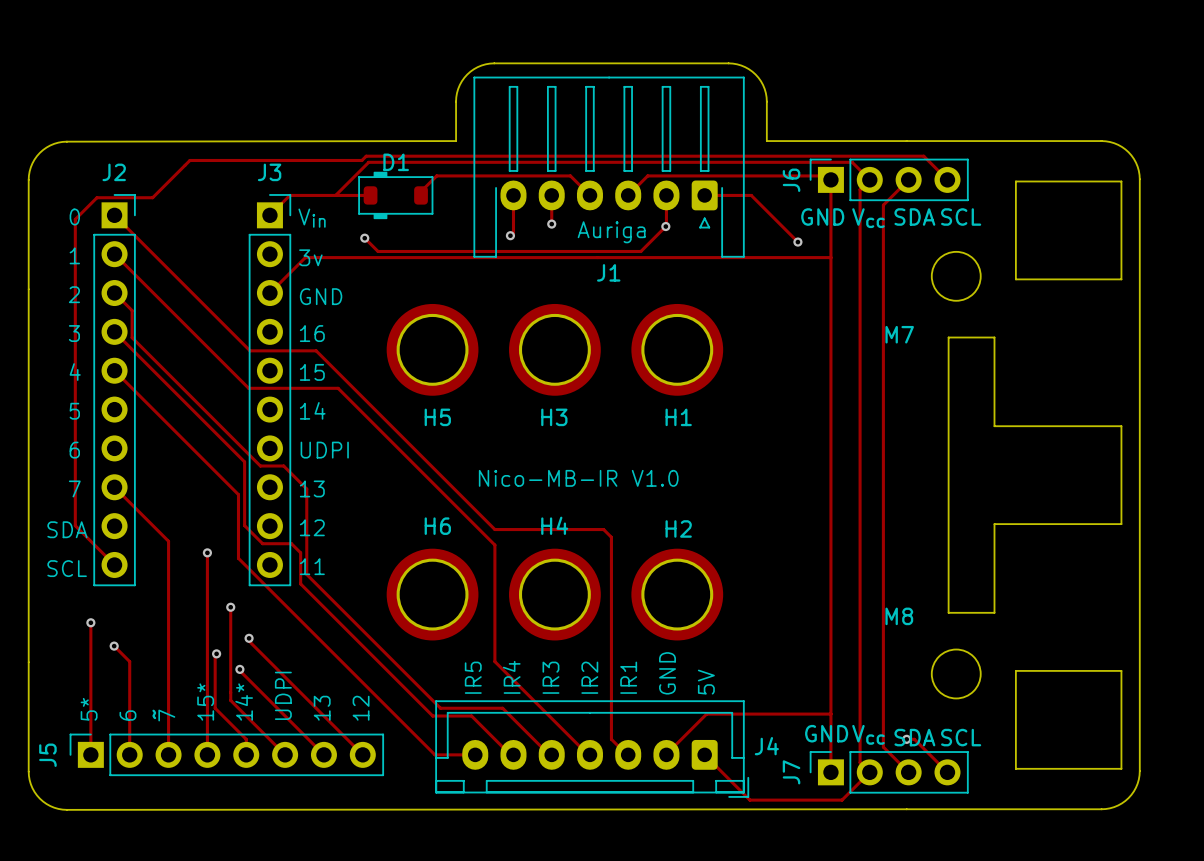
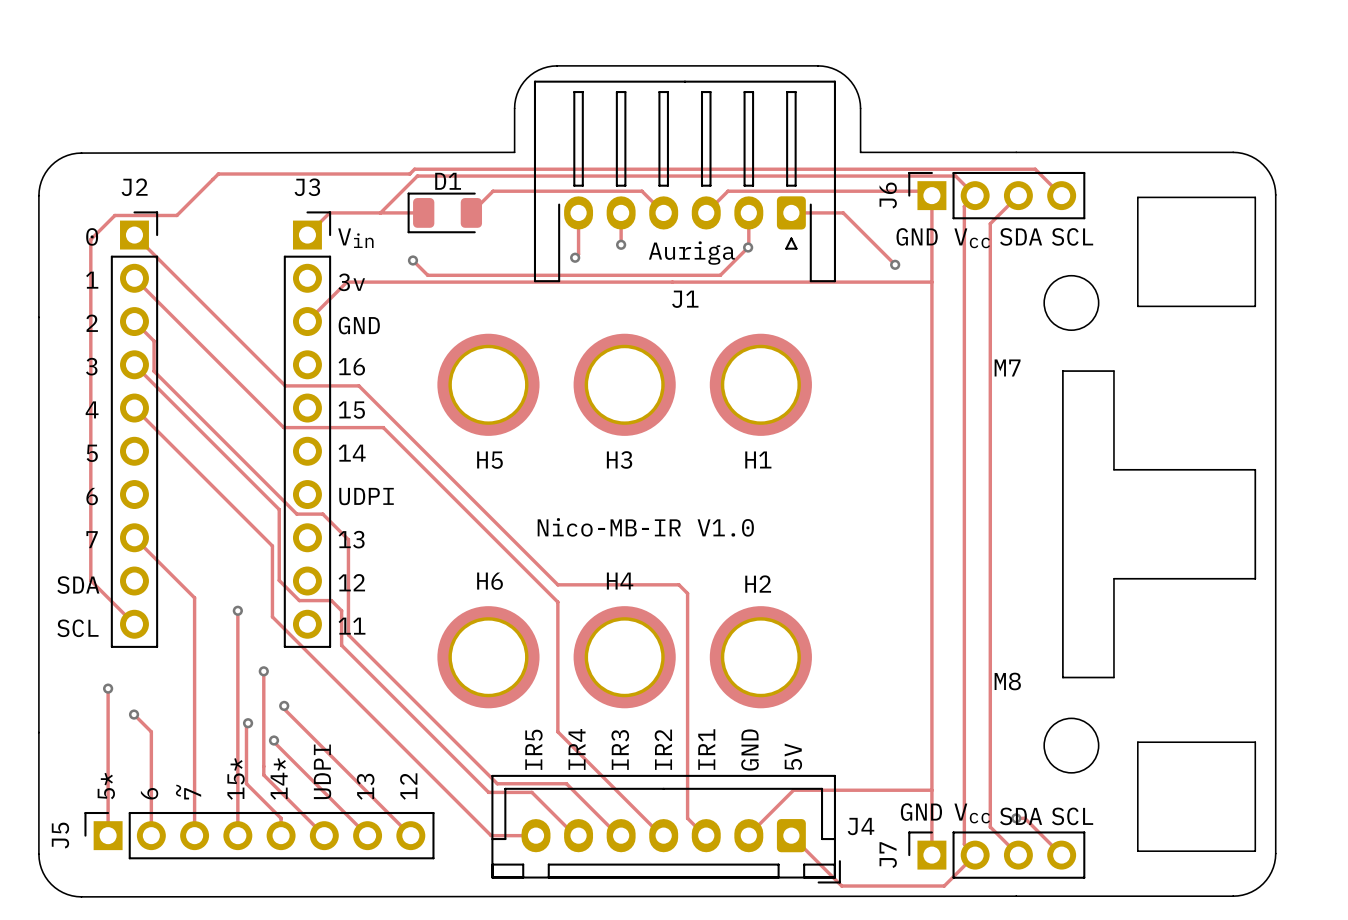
D1 footprint: [358, 171, 434, 220] -> [407, 192, 483, 234]

